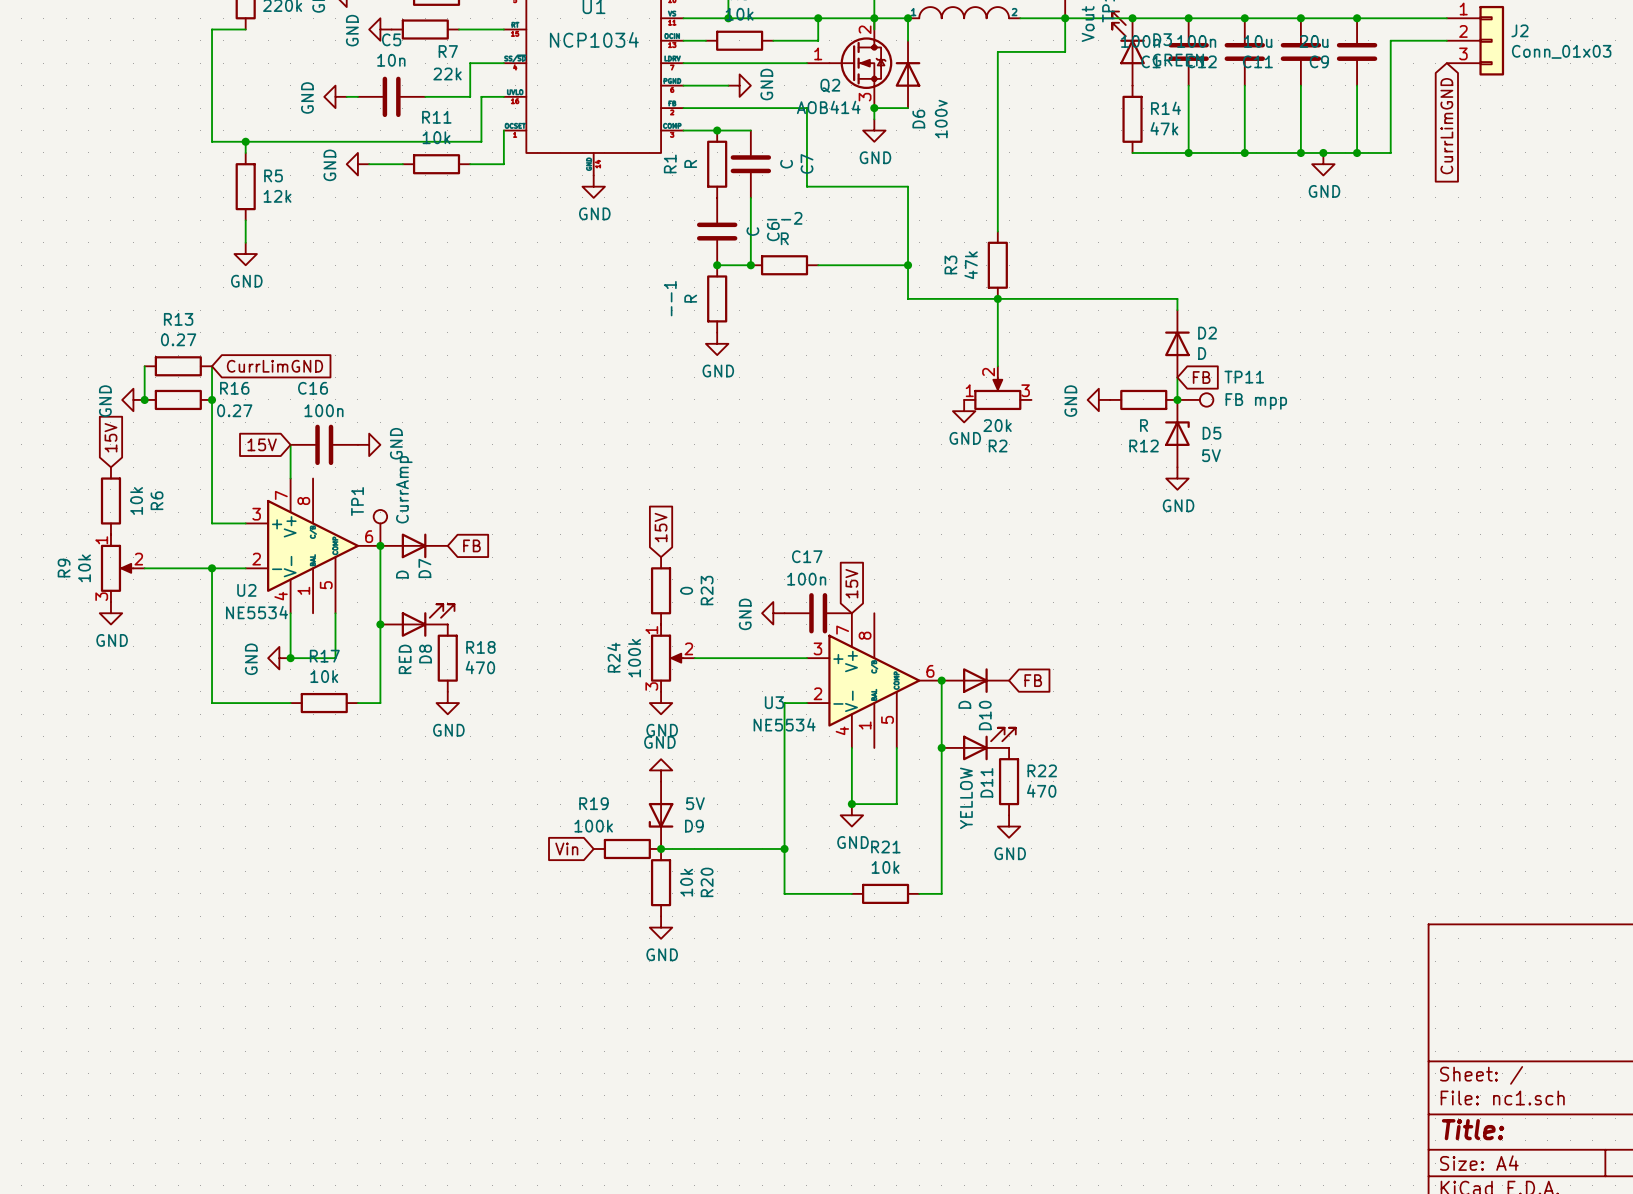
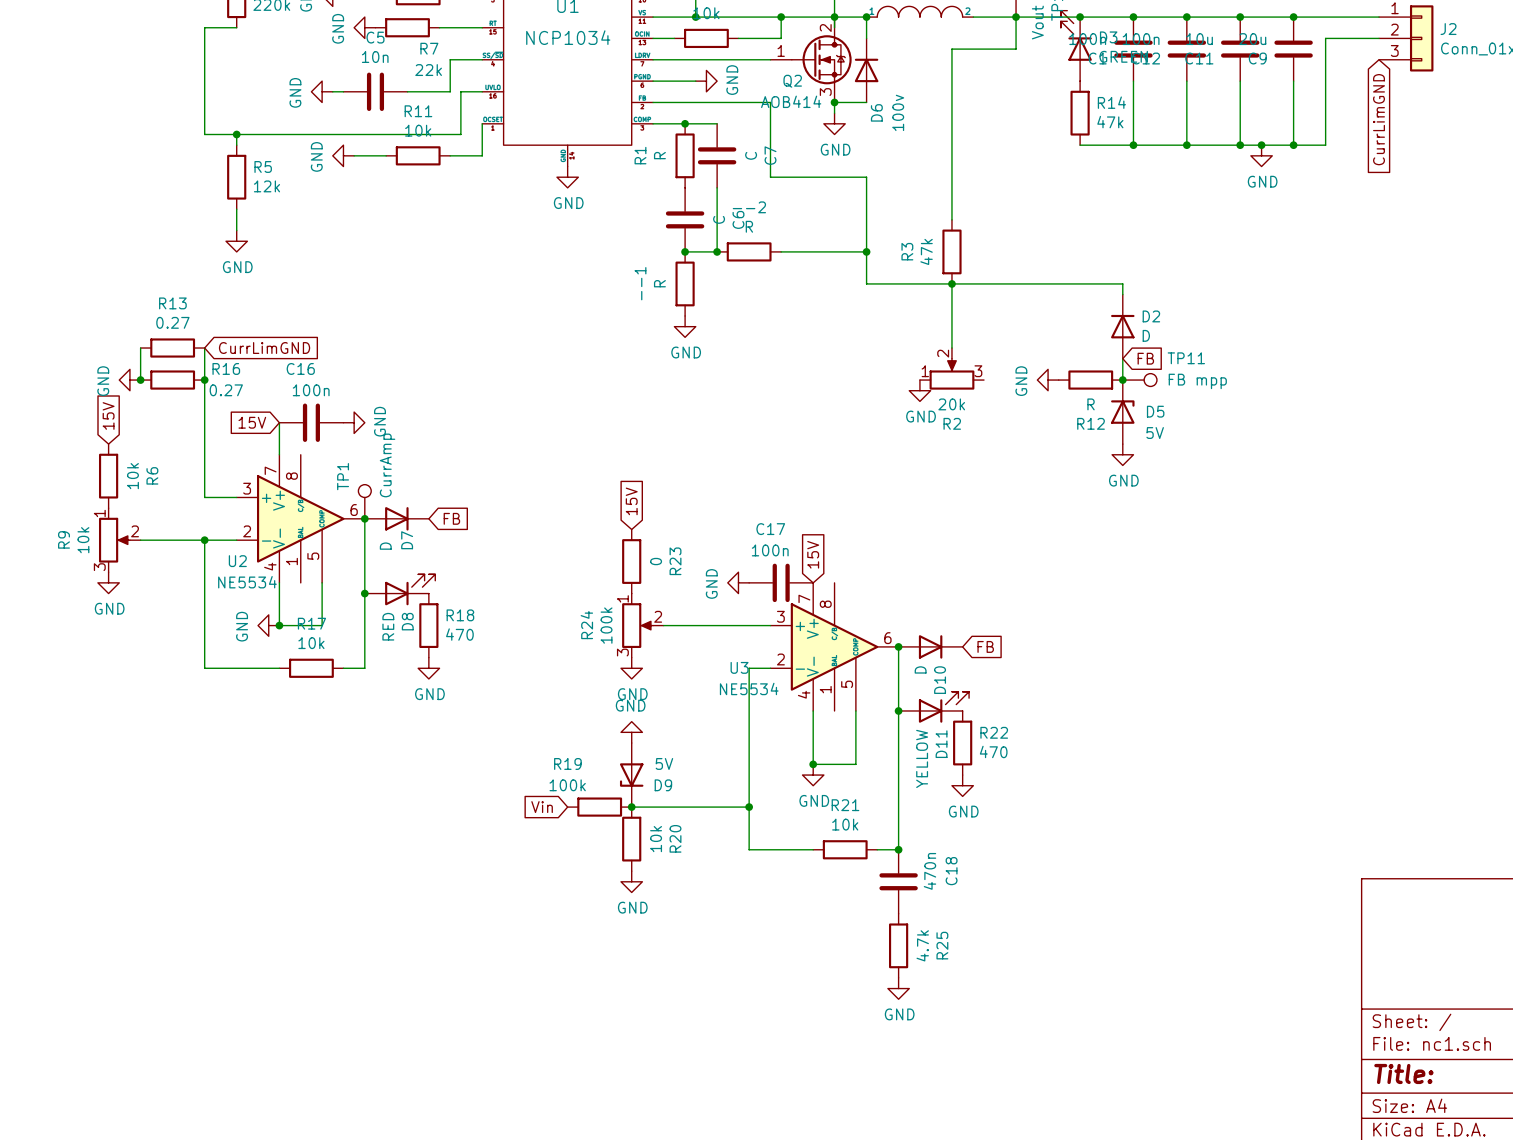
junction: none -> (898, 849)
C18: none -> 470n (898, 881)
R25: none -> 4.7k (898, 945)
power symbol: none -> GND (898, 988)

